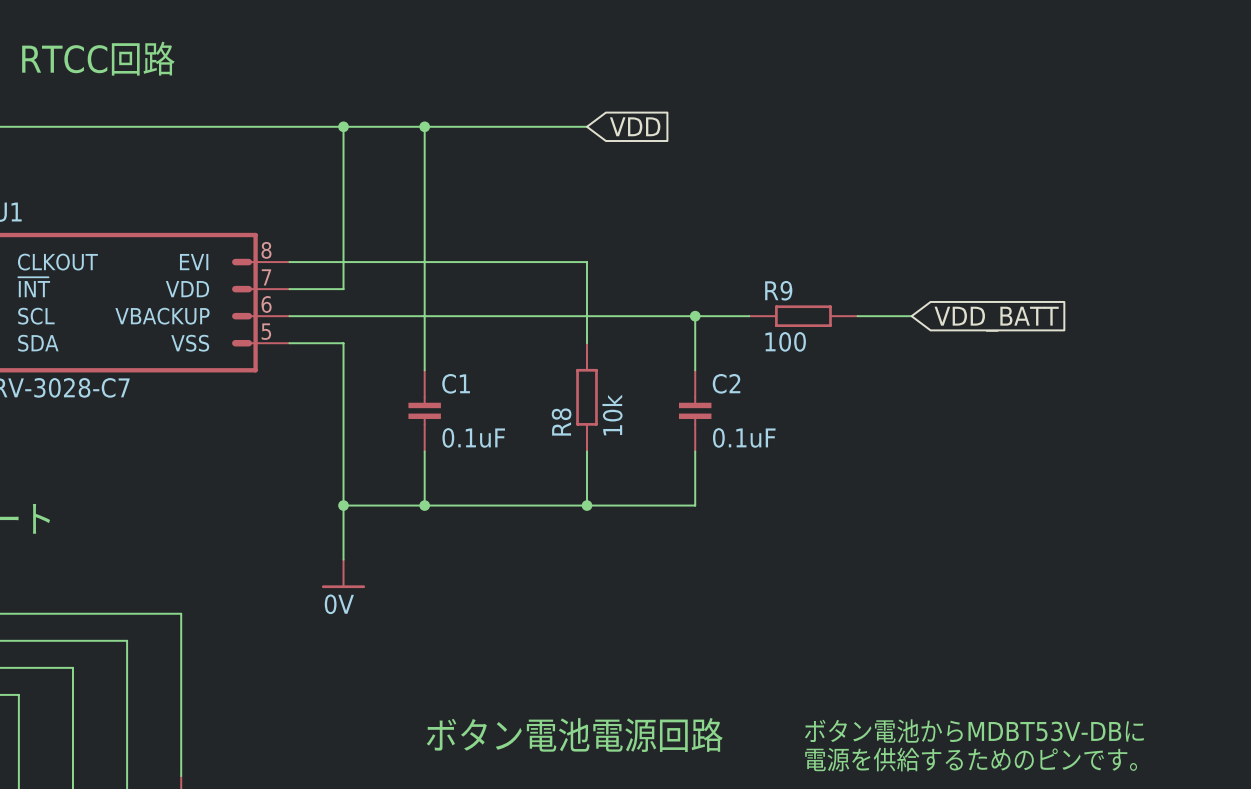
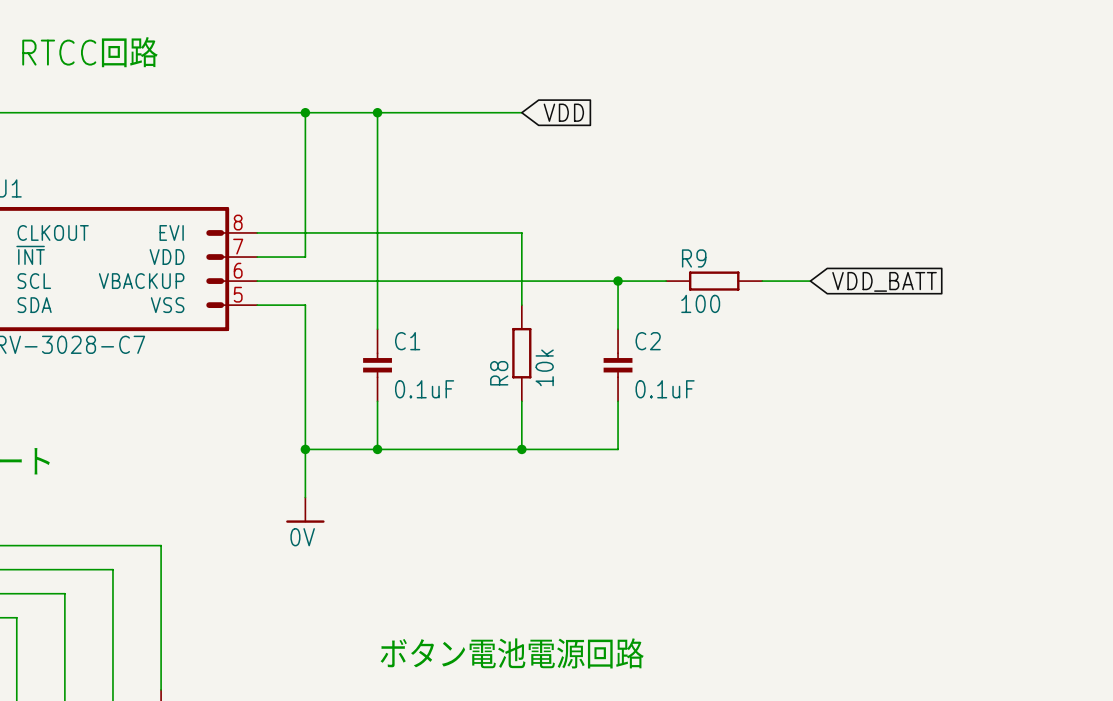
text: ボタン電池からMDBT53V-DBに (974, 731) -> none
text: 電源を供給するためのピンです。 (971, 759) -> none

